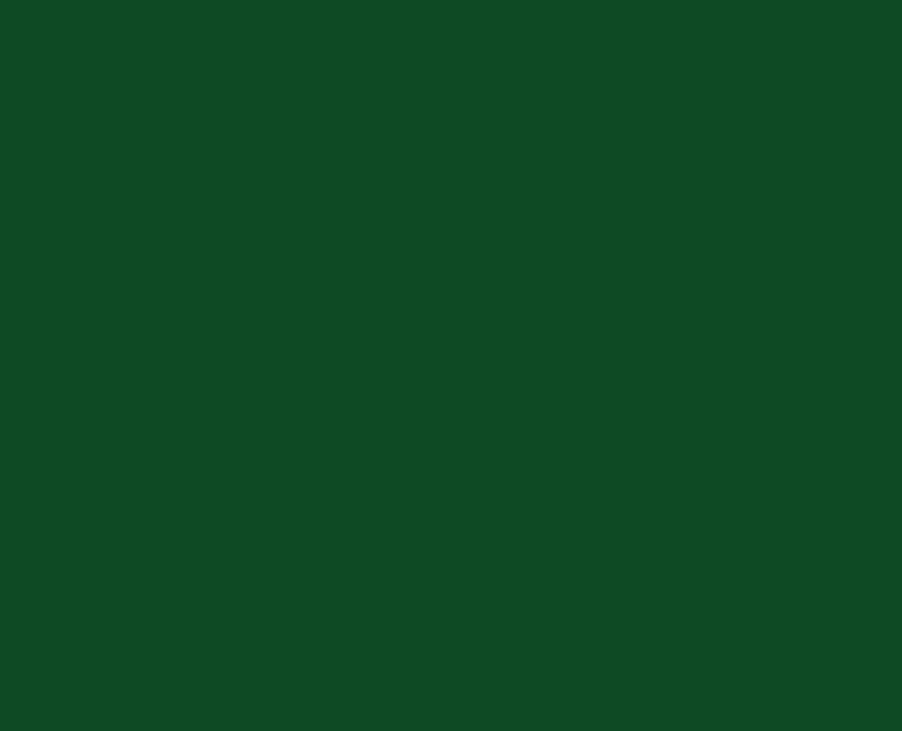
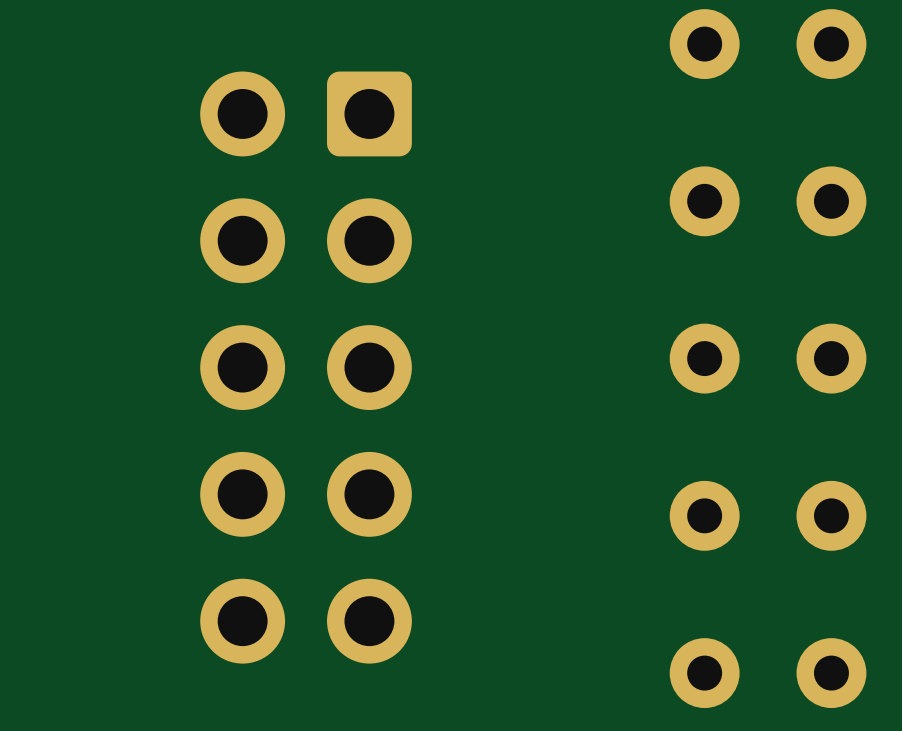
part: none -> (768, 44)
part: none -> (768, 201)
part: none -> (768, 358)
part: none -> (306, 367)
part: none -> (768, 515)
part: none -> (768, 673)

